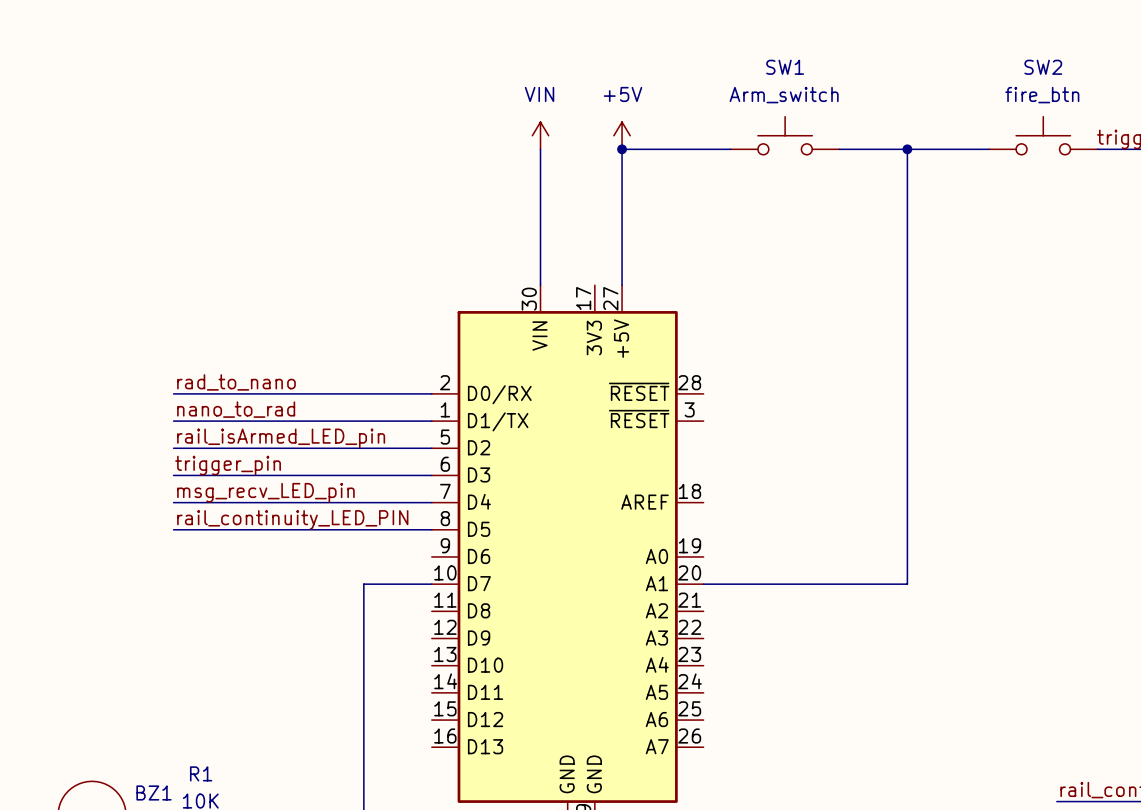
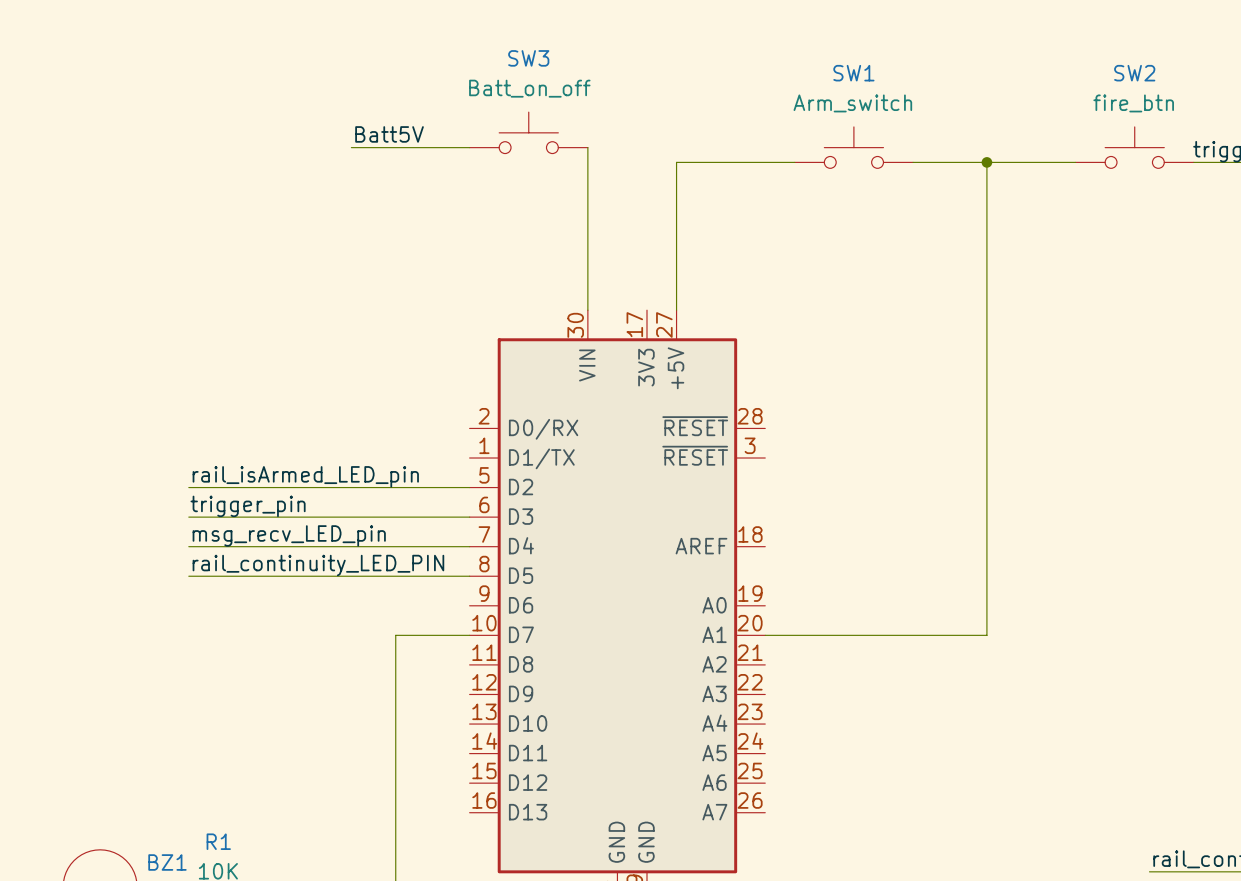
SW3: none -> Batt_on_off (528, 132)
label: none -> Batt5V (389, 134)
wire: none -> (351, 147) (469, 147)
power symbol: VIN (540, 135) -> none
power symbol: +5V (622, 135) -> none
junction: (622, 149) -> none
label: rad_to_nano (236, 382) -> none
wire: (173, 393) (431, 393) -> none
label: nano_to_rad (236, 409) -> none
wire: (173, 421) (431, 421) -> none

